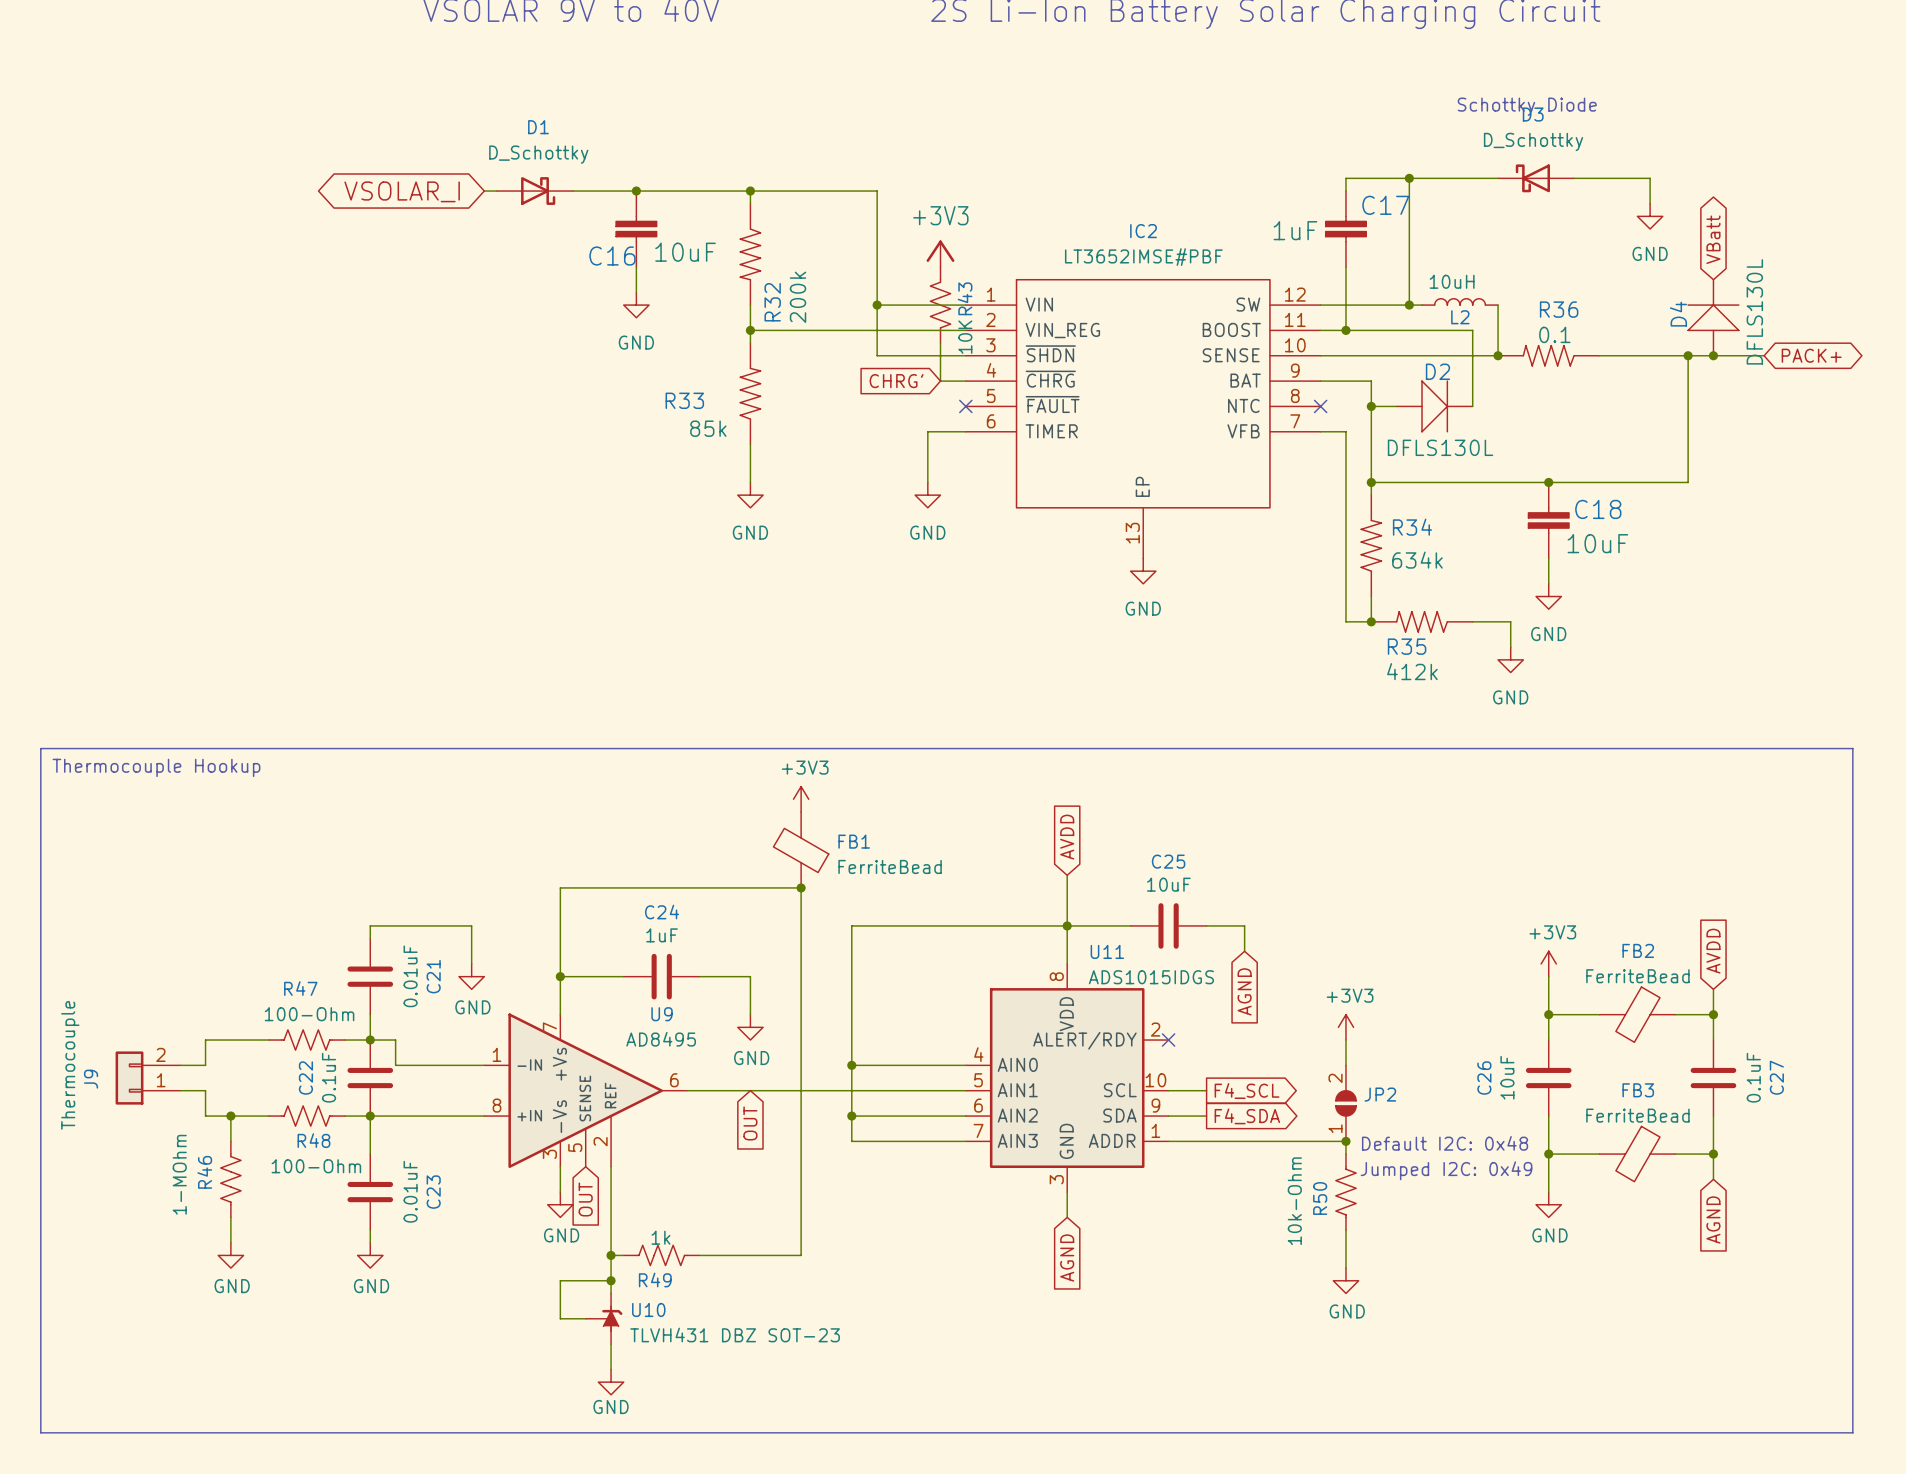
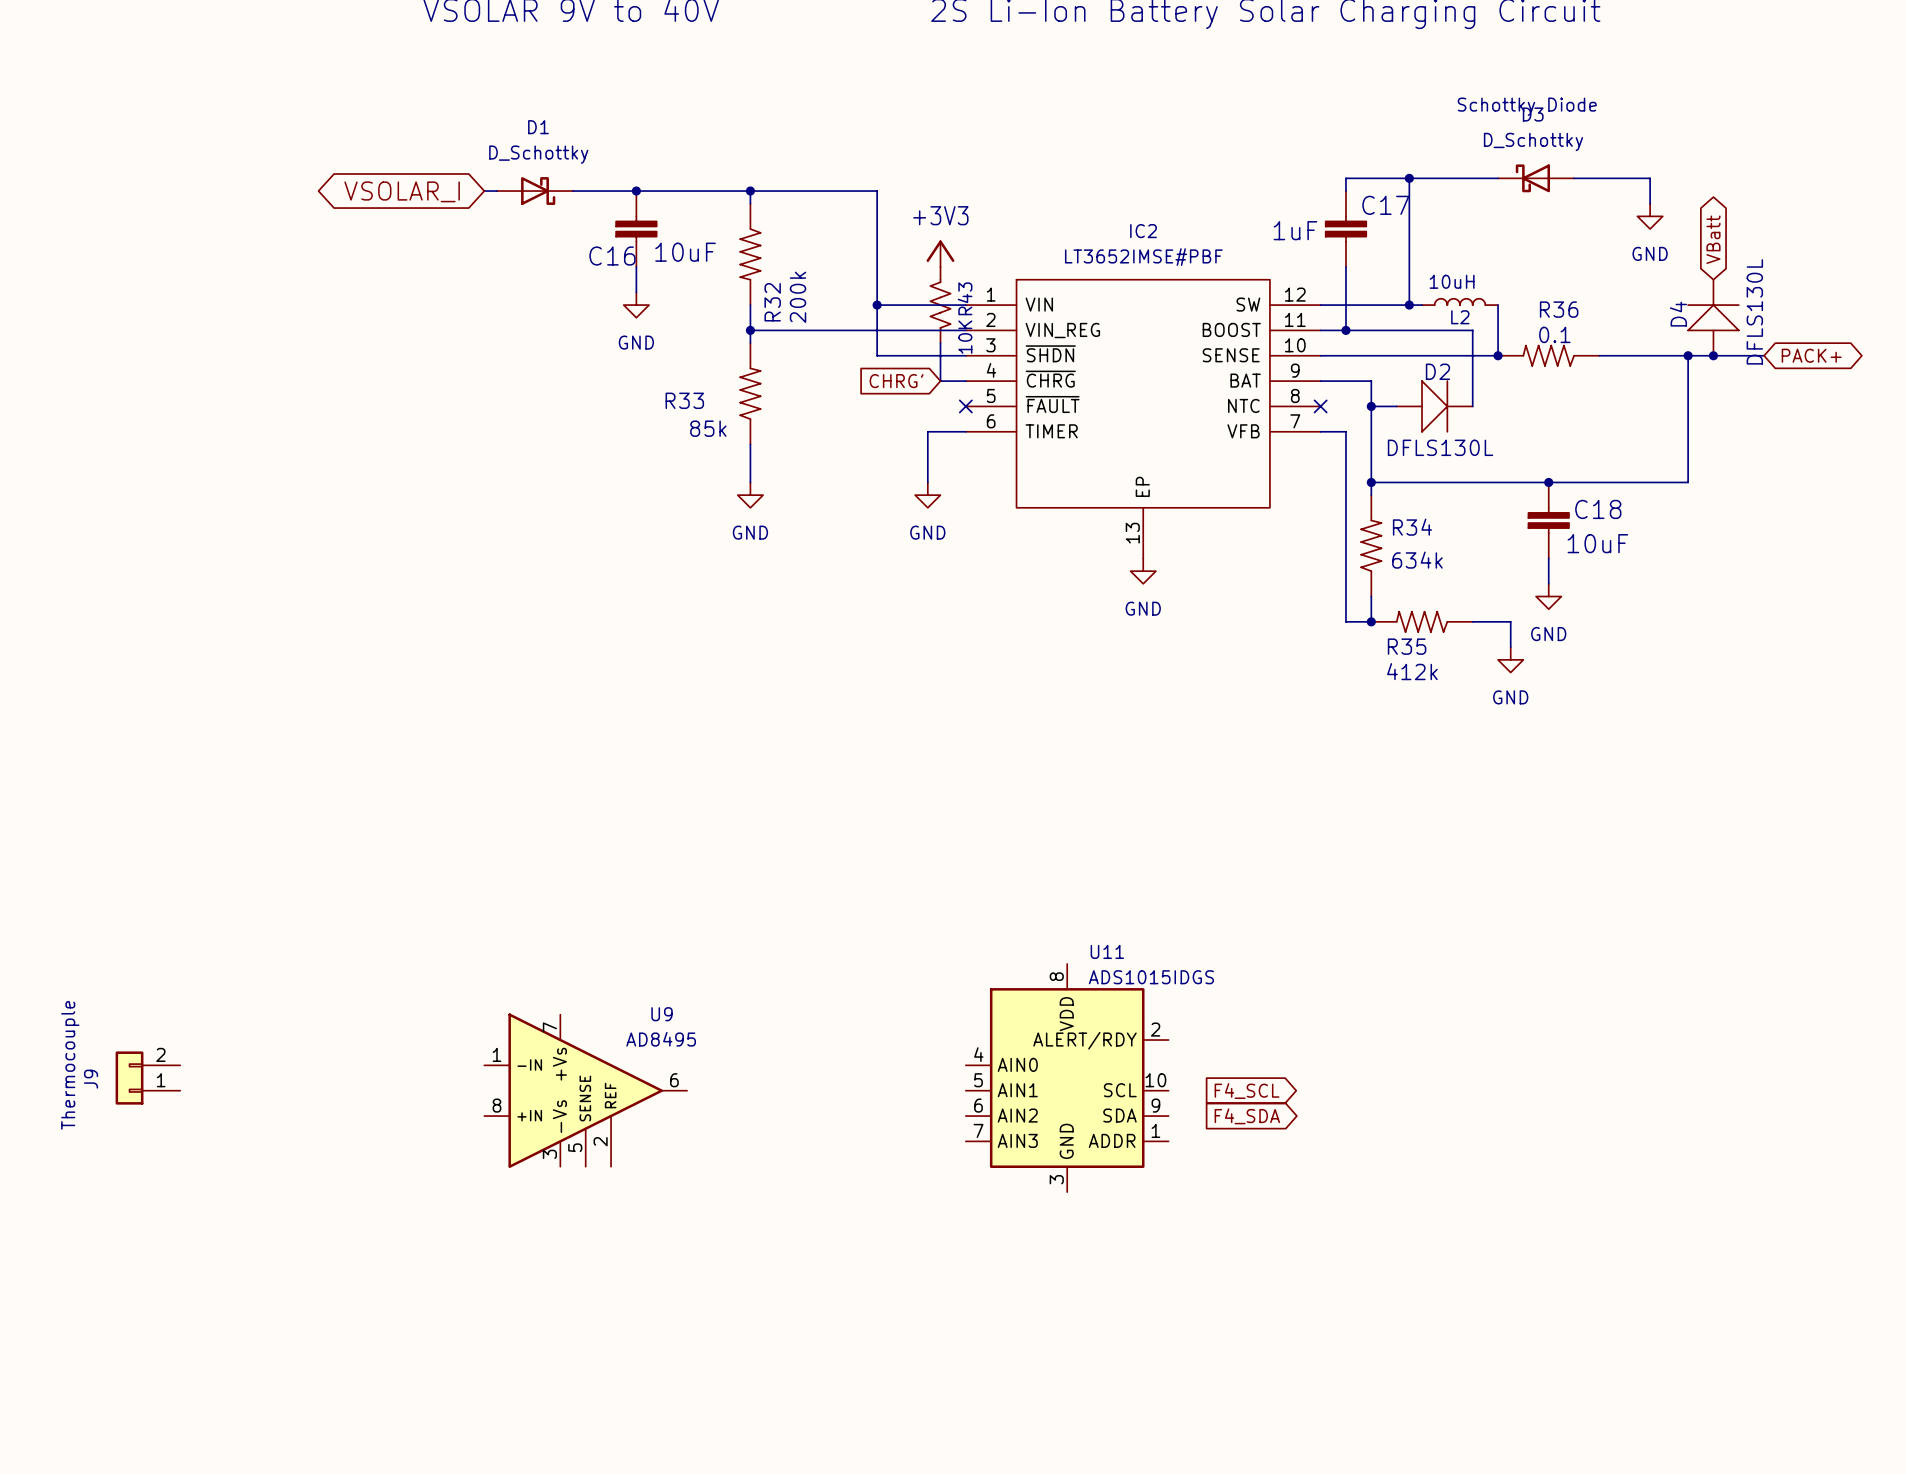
line: (40, 748) (1852, 748) (1852, 1432) (40, 1432) (40, 748) -> none
text: Thermocouple Hookup (156, 767) -> none
power symbol: +3V3 (801, 799) -> none
global label: AVDD (1067, 837) -> none
FB1: FerriteBead (801, 849) -> none
wire: (1067, 875) (1067, 963) -> none
junction: (801, 887) -> none
junction: (1067, 925) -> none
wire: (1130, 925) (851, 925) (851, 1141) (965, 1141) -> none
C25: 10uF (1168, 925) -> none
wire: (1206, 925) (1244, 925) (1244, 951) -> none
wire: (370, 938) (370, 925) (471, 925) (471, 963) -> none
global label: AVDD (1713, 951) -> none
power symbol: +3V3 (1548, 963) -> none
C21: 0.01uF (370, 976) -> none
power symbol: GND (471, 976) -> none
wire: (560, 976) (623, 976) -> none
junction: (560, 976) -> none
C24: 1uF (661, 976) -> none
wire: (699, 976) (750, 976) (750, 1014) -> none
wire: (1548, 976) (1548, 1040) -> none
wire: (1713, 989) (1713, 1040) -> none
global label: AGND (1244, 991) -> none
wire: (370, 1014) (370, 1040) -> none
wire: (560, 1014) (560, 887) (801, 887) (801, 1255) (699, 1255) -> none
wire: (1548, 1014) (1599, 1014) -> none
junction: (1548, 1014) -> none
FB2: FerriteBead (1637, 1014) -> none
wire: (1675, 1014) (1713, 1014) -> none
junction: (1713, 1014) -> none
power symbol: GND (750, 1027) -> none
power symbol: +3V3 (1345, 1027) -> none
wire: (268, 1040) (205, 1040) (205, 1065) (180, 1065) -> none
R47: 100-Ohm (306, 1040) -> none
wire: (344, 1040) (395, 1040) (395, 1065) (484, 1065) -> none
junction: (370, 1040) -> none
no-connect mark: (1168, 1040) -> none
wire: (1345, 1040) (1345, 1065) -> none
wire: (851, 1065) (965, 1065) -> none
junction: (851, 1065) -> none
C22: 0.1uF (370, 1078) -> none
C26: 10uF (1548, 1078) -> none
C27: 0.1uF (1713, 1078) -> none
wire: (180, 1090) (205, 1090) (205, 1116) (268, 1116) -> none
wire: (687, 1090) (965, 1090) -> none
wire: (1168, 1090) (1206, 1090) -> none
JP2: (1345, 1103) -> none
wire: (230, 1116) (230, 1141) -> none
junction: (230, 1116) -> none
R48: 100-Ohm (306, 1116) -> none
wire: (344, 1116) (484, 1116) -> none
wire: (370, 1116) (370, 1154) -> none
junction: (370, 1116) -> none
wire: (851, 1116) (965, 1116) -> none
junction: (851, 1116) -> none
wire: (1168, 1116) (1206, 1116) -> none
wire: (1548, 1116) (1548, 1192) -> none
wire: (1713, 1116) (1713, 1179) -> none
global label: OUT (750, 1123) -> none
wire: (1168, 1141) (1345, 1141) (1345, 1154) -> none
junction: (1345, 1141) -> none
text: Default I2C: 0x48 (1445, 1143) -> none
wire: (1548, 1154) (1599, 1154) -> none
junction: (1548, 1154) -> none
FB3: FerriteBead (1637, 1154) -> none
wire: (1675, 1154) (1713, 1154) -> none
junction: (1713, 1154) -> none
wire: (560, 1166) (560, 1192) -> none
wire: (611, 1166) (611, 1293) -> none
text: Jumped I2C: 0x49 (1446, 1170) -> none
R46: 1-MOhm (230, 1179) -> none
C23: 0.01uF (370, 1192) -> none
wire: (1067, 1192) (1067, 1217) -> none
R50: 10k-Ohm (1345, 1192) -> none
global label: OUT (585, 1199) -> none
power symbol: GND (560, 1204) -> none
power symbol: GND (1548, 1204) -> none
wire: (230, 1217) (230, 1242) -> none
global label: AGND (1713, 1220) -> none
wire: (370, 1230) (370, 1242) -> none
wire: (1345, 1230) (1345, 1268) -> none
power symbol: GND (230, 1255) -> none
power symbol: GND (370, 1255) -> none
wire: (611, 1255) (623, 1255) -> none
junction: (611, 1255) -> none
R49: 1k (661, 1255) -> none
global label: AGND (1067, 1258) -> none
wire: (611, 1280) (560, 1280) (560, 1318) (585, 1318) -> none
junction: (611, 1280) -> none
power symbol: GND (1345, 1280) -> none
U10: TLVH431 DBZ SOT-23 (604, 1318) -> none
wire: (611, 1344) (611, 1369) -> none
power symbol: GND (611, 1382) -> none

